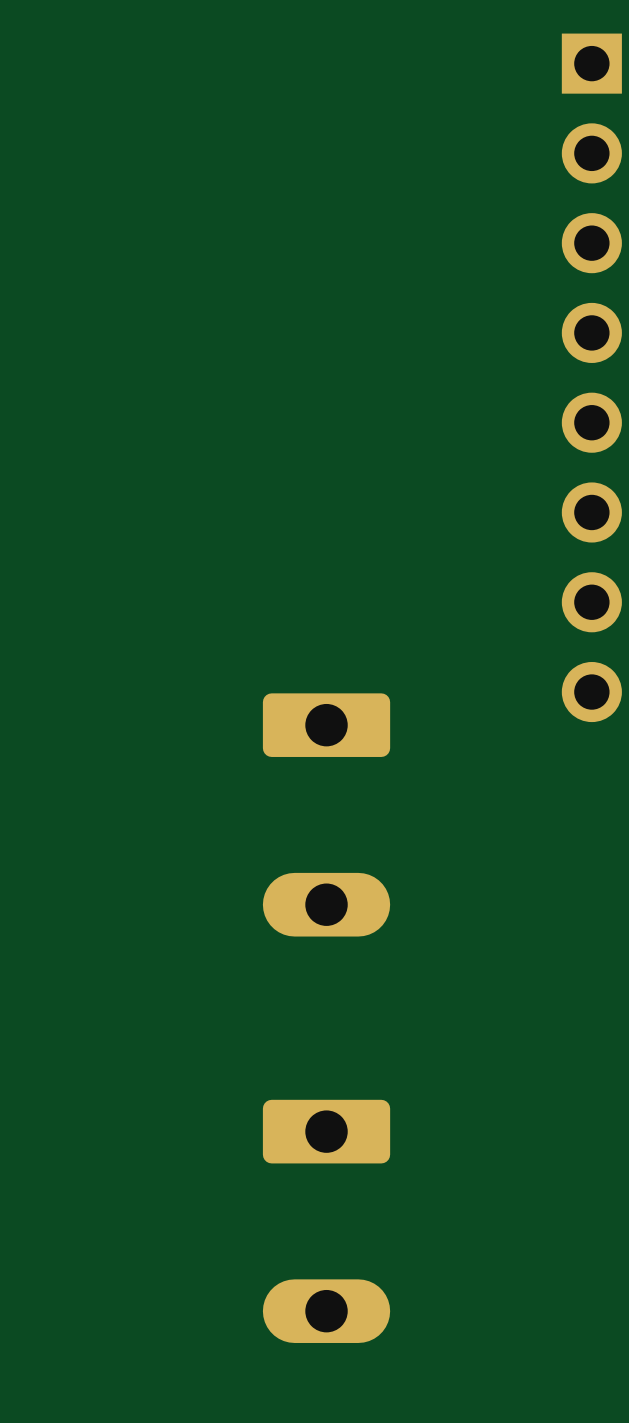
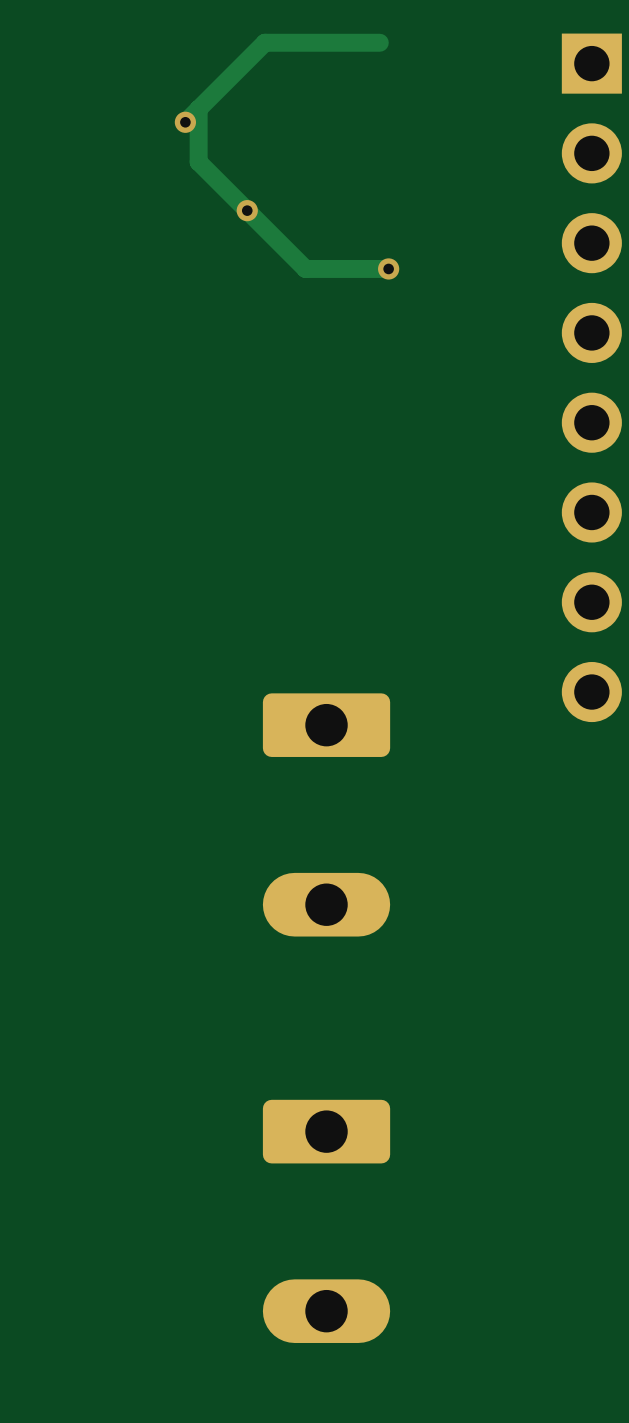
track: none -> (379, 42) (264, 42) (185, 122)
track: none -> (198, 109) (198, 162) (305, 268) (388, 268)
via: none -> (185, 122)
via: none -> (247, 210)
via: none -> (388, 268)

